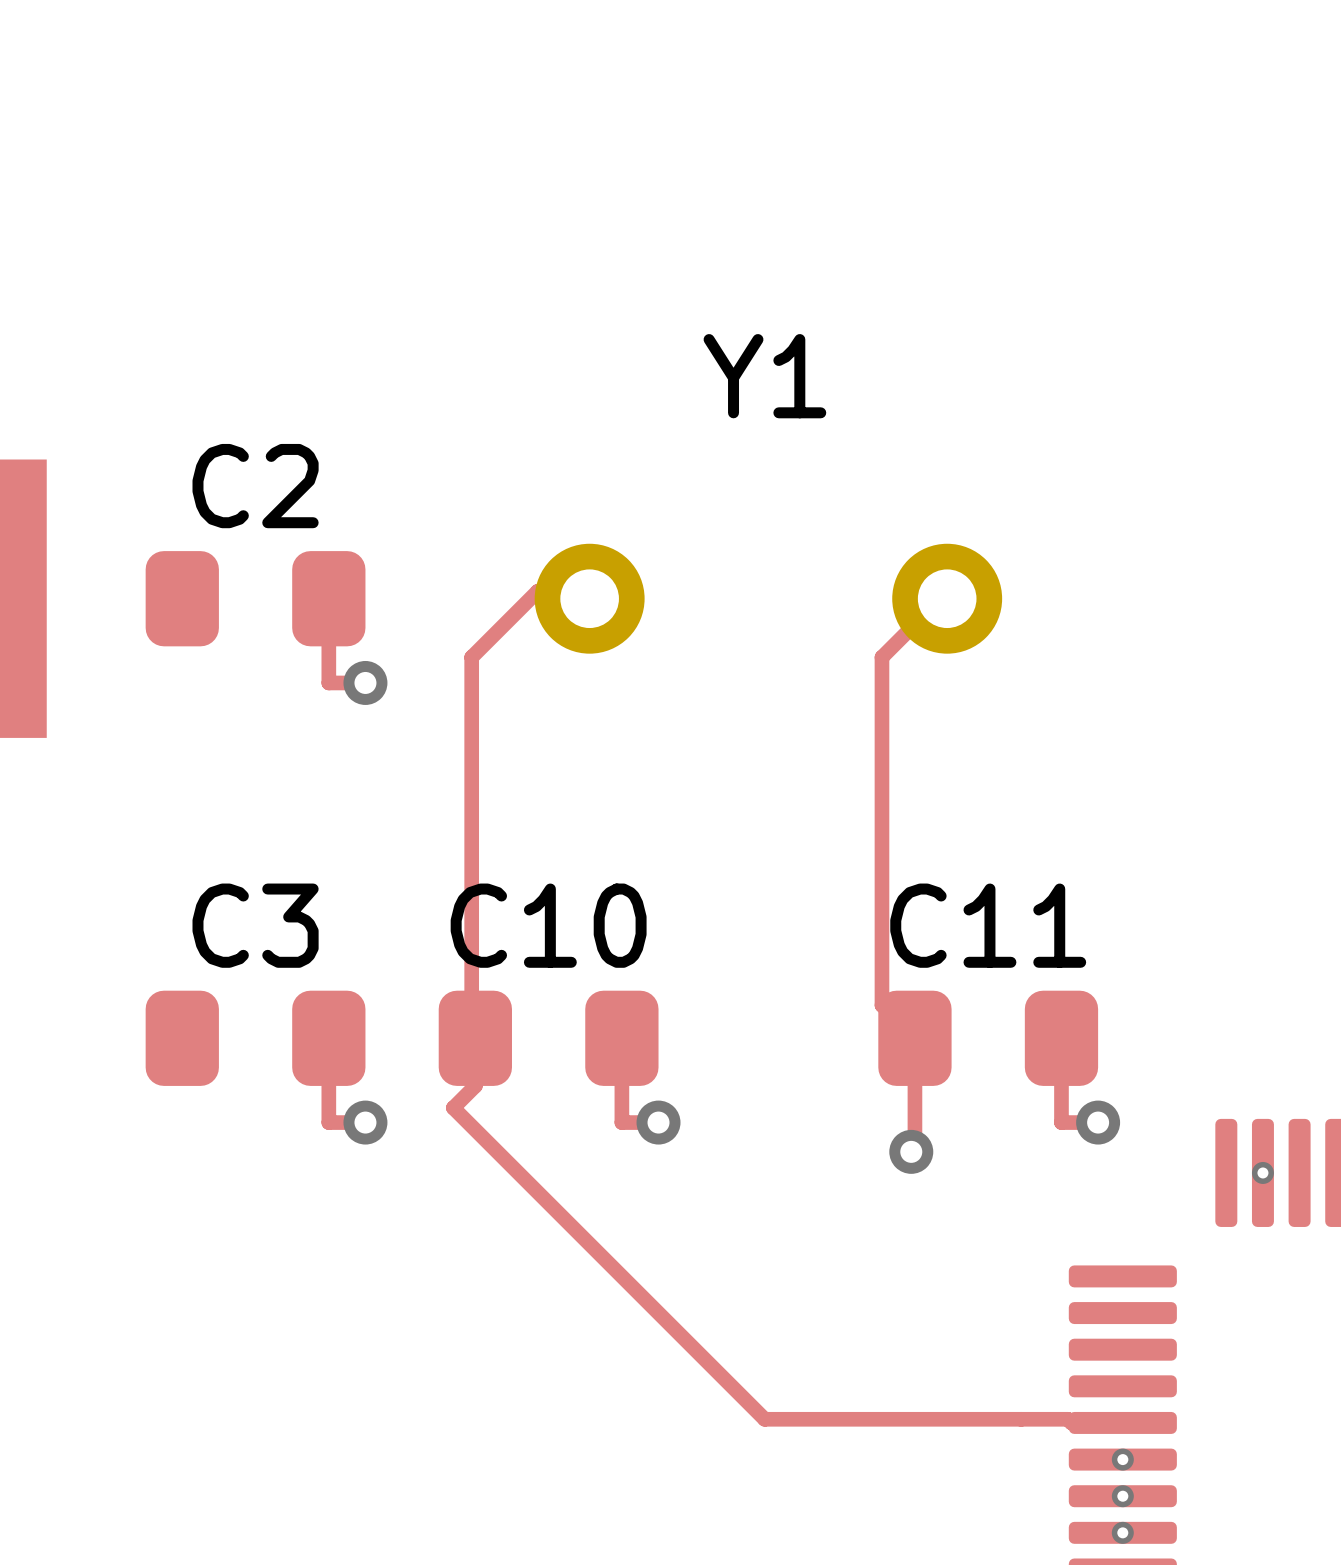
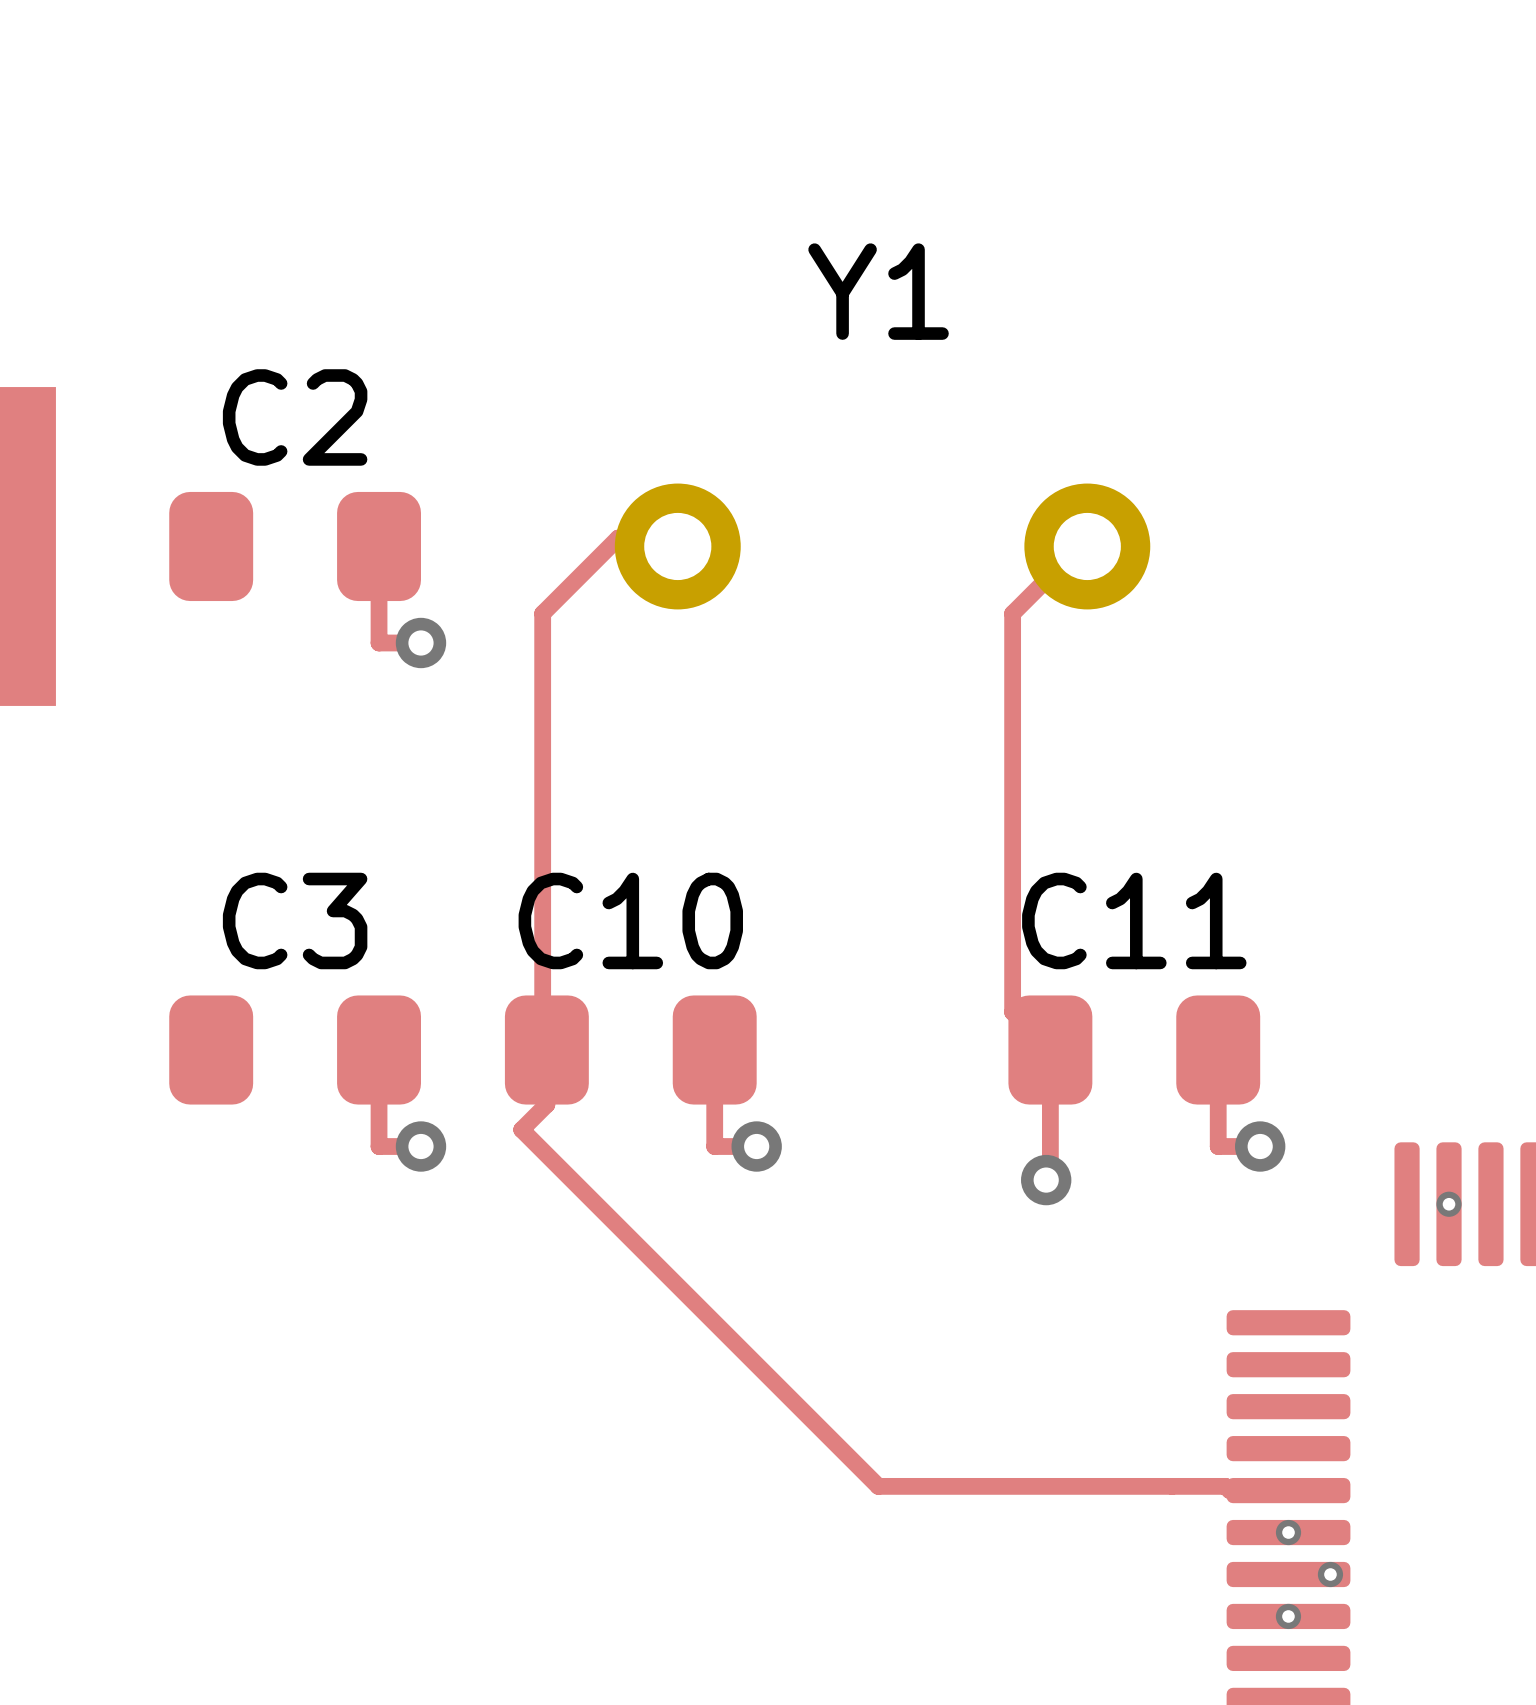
via position: (1122, 1496) -> (1330, 1574)

